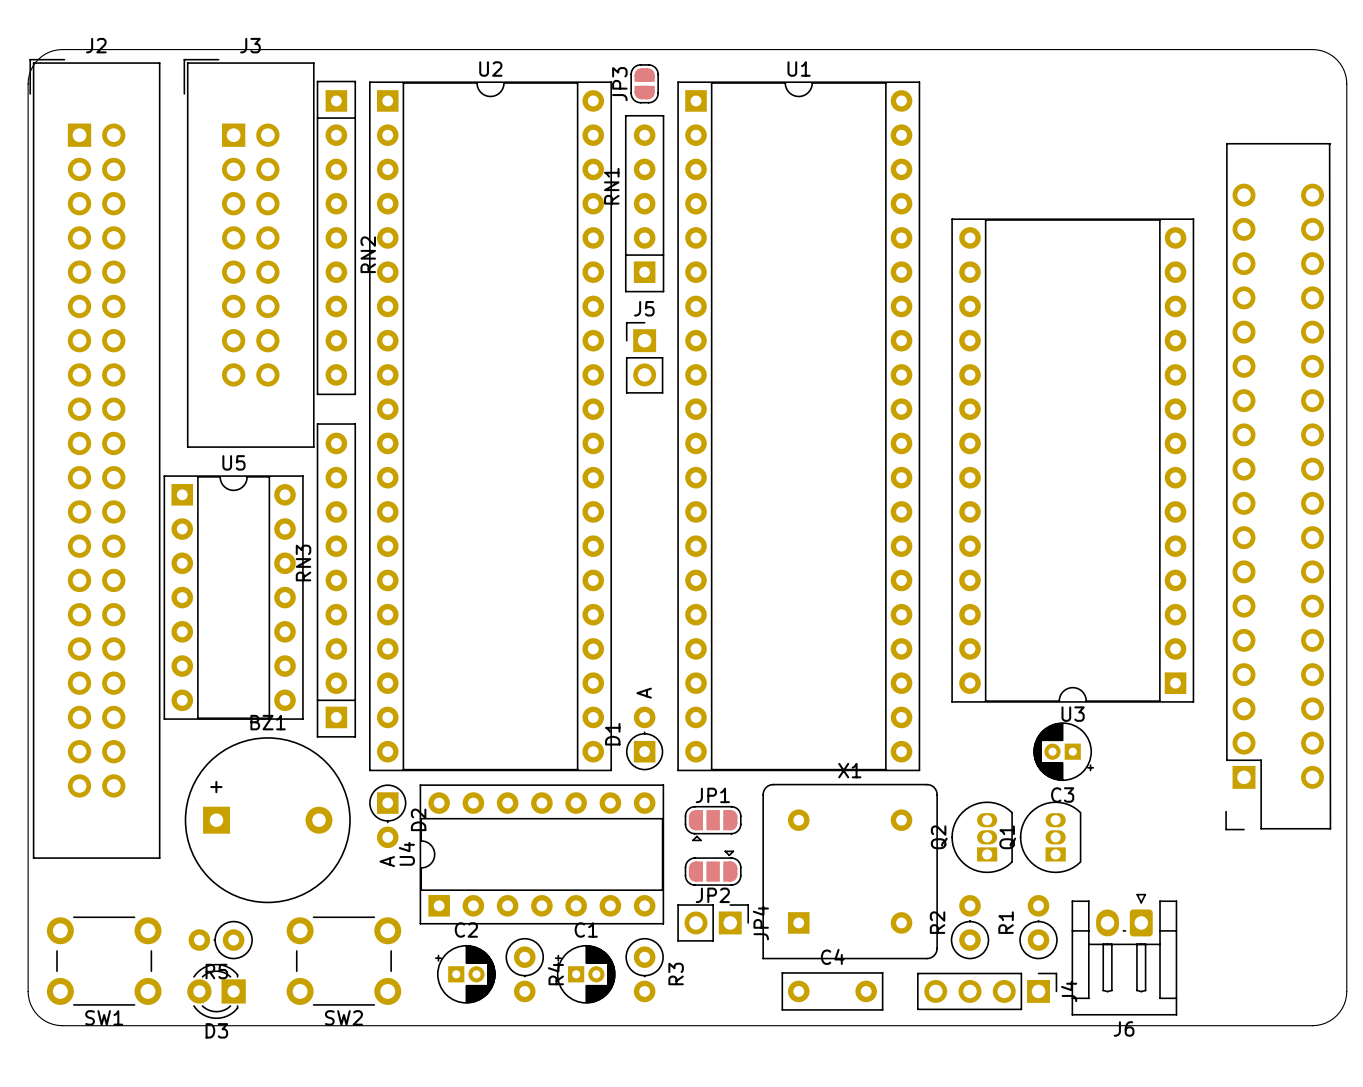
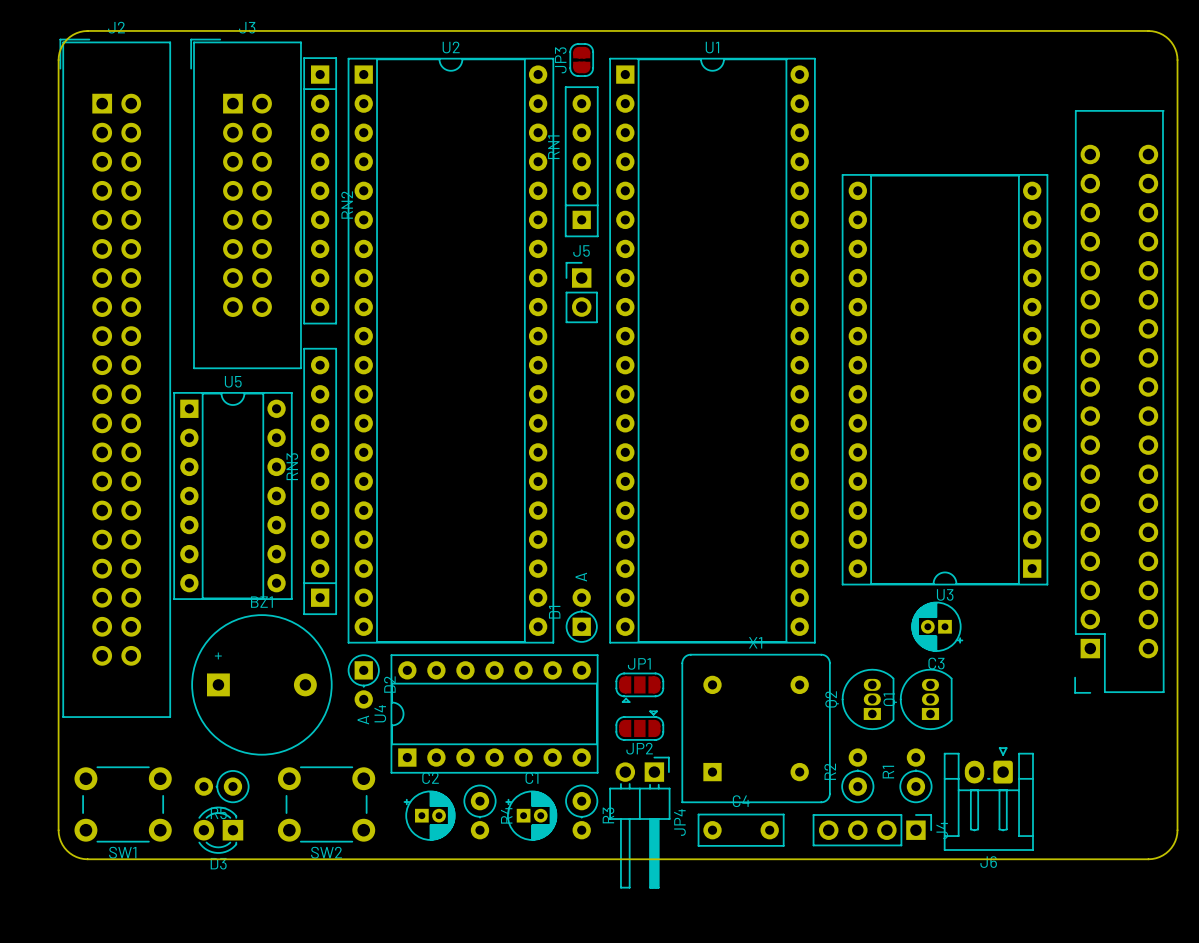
JP4 footprint: [677, 904, 750, 942] -> [609, 756, 671, 889]

